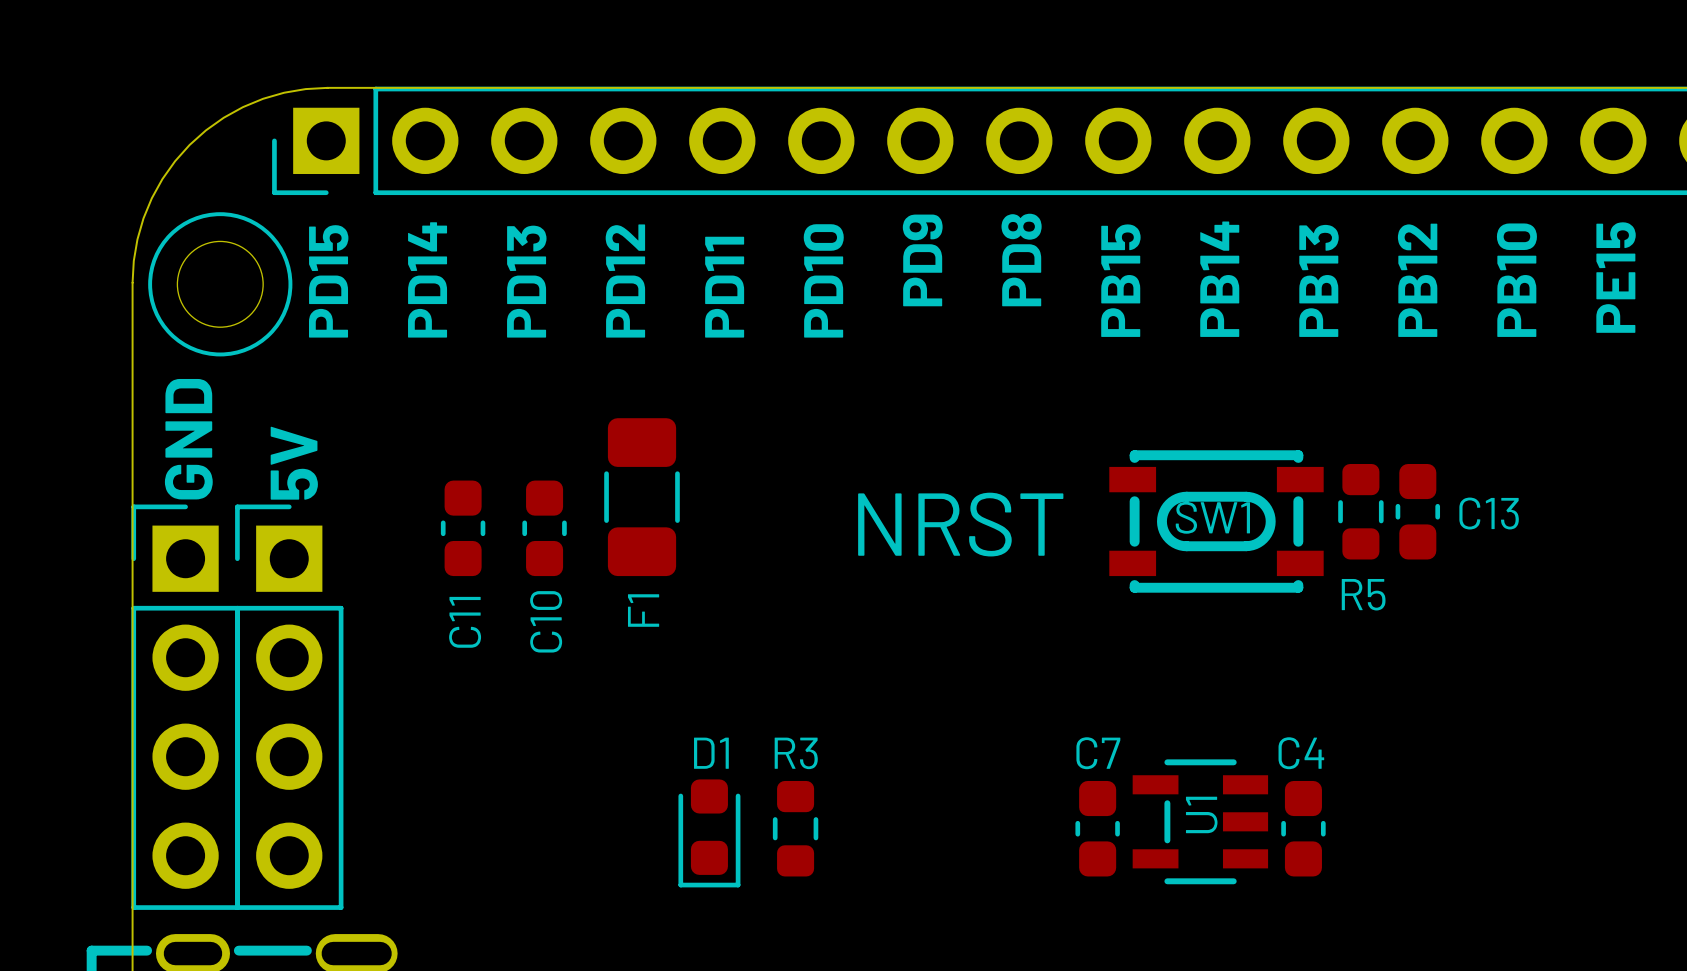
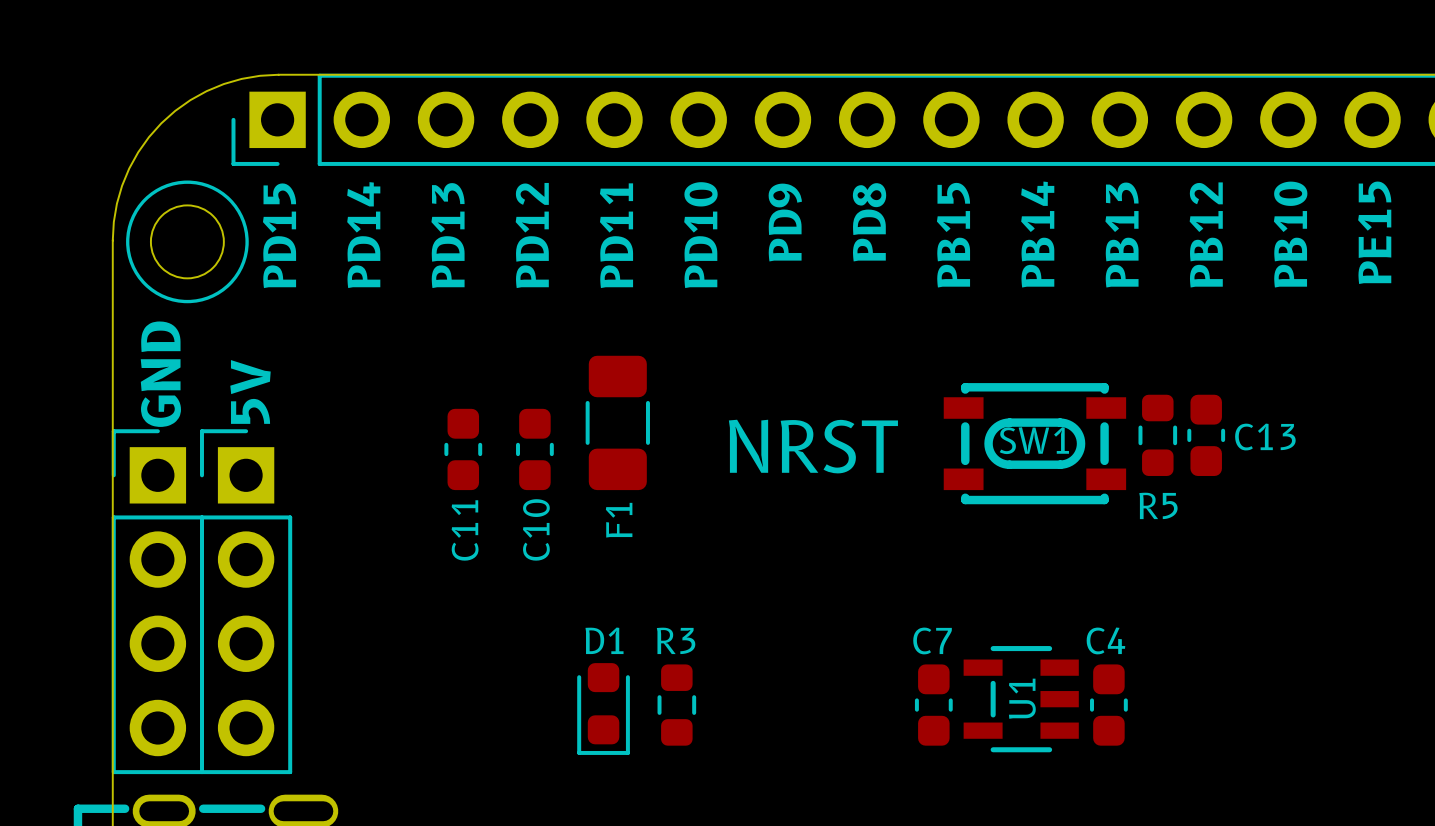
F1 position: (642, 497) -> (617, 422)
C11: (463, 528) -> none
C10: none -> (534, 449)
C10 name: C10 (546, 621) -> C11 (465, 530)

